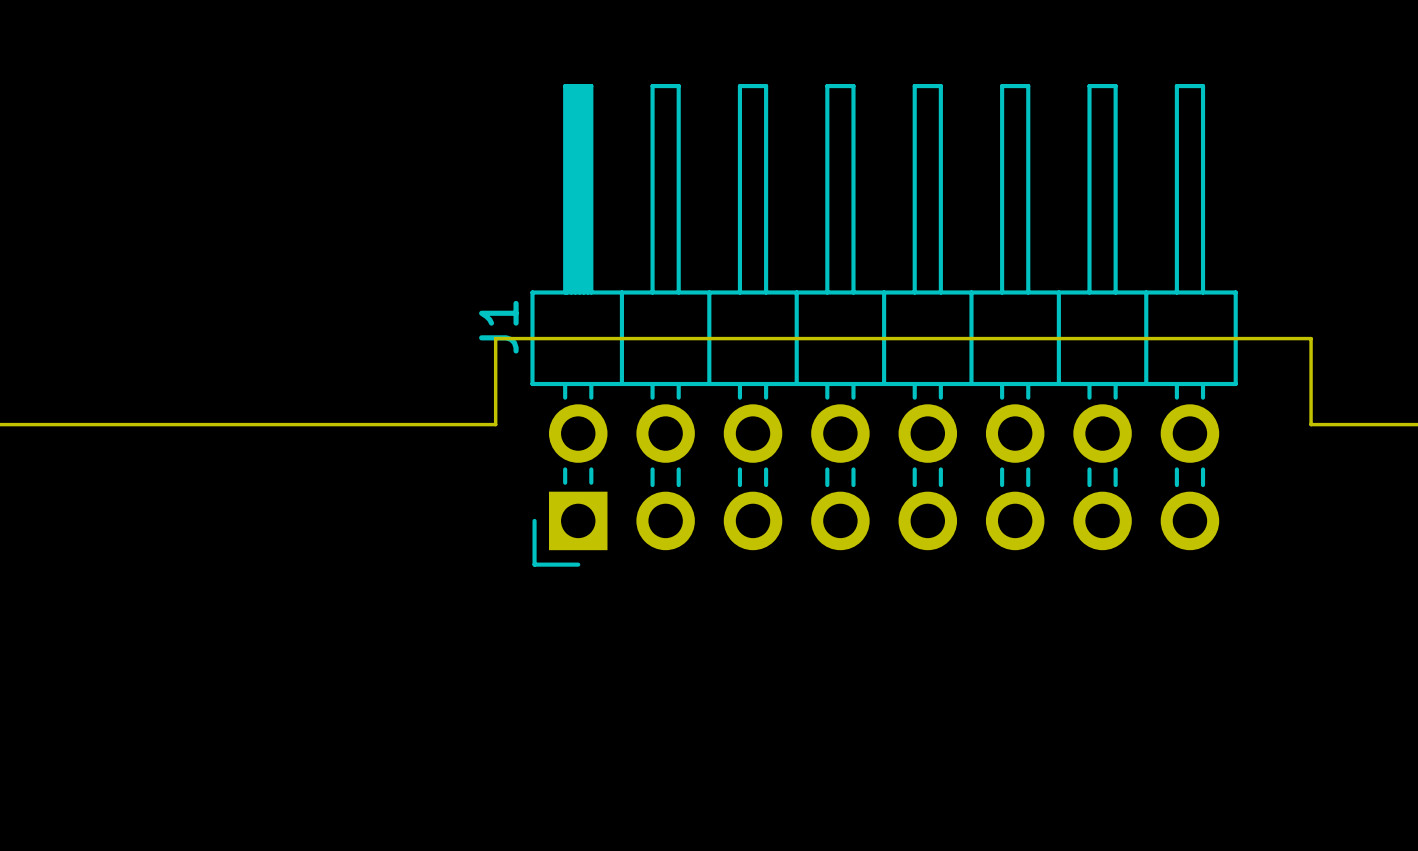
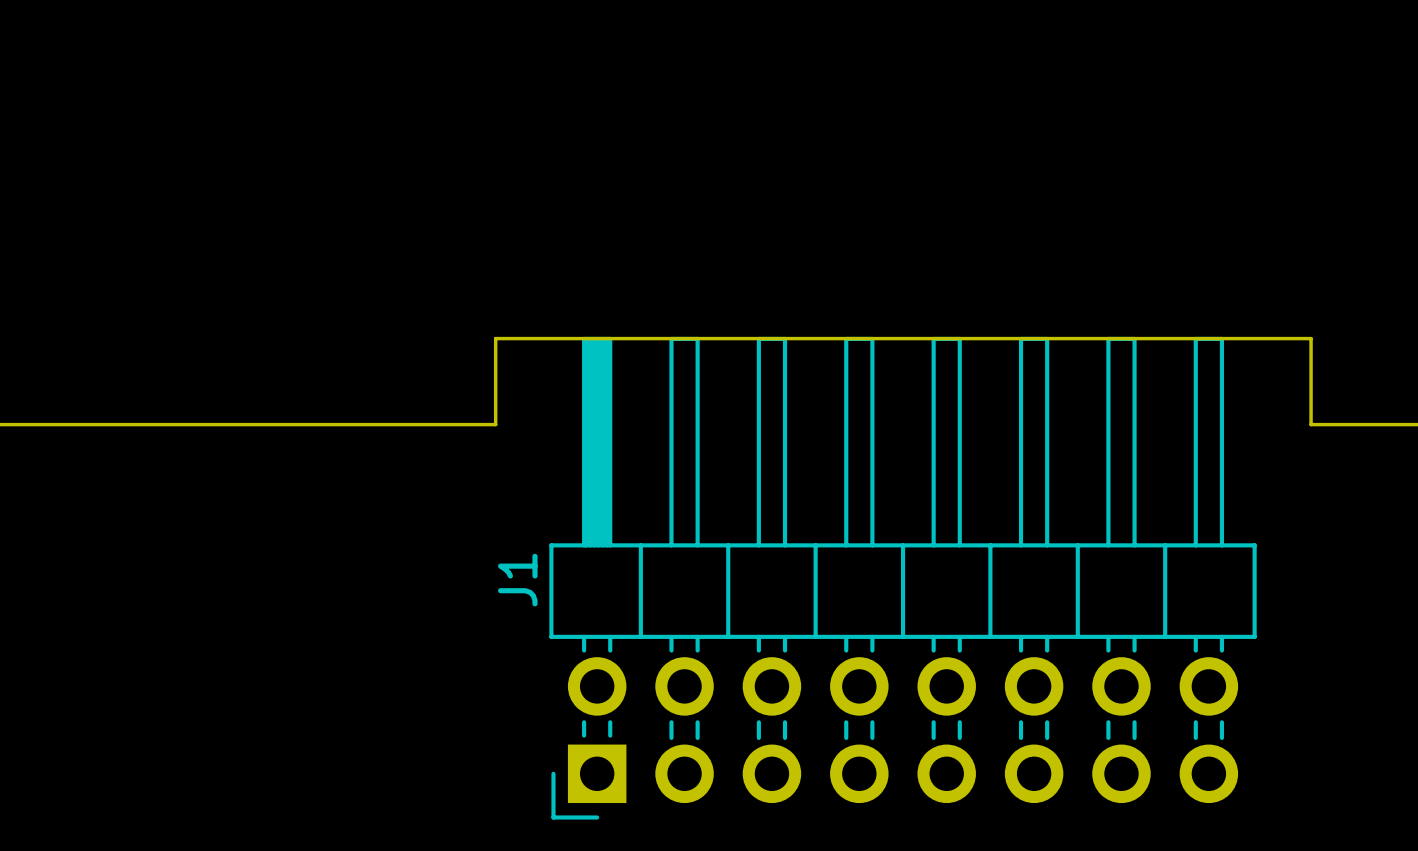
J1 position: (884, 325) -> (903, 578)

